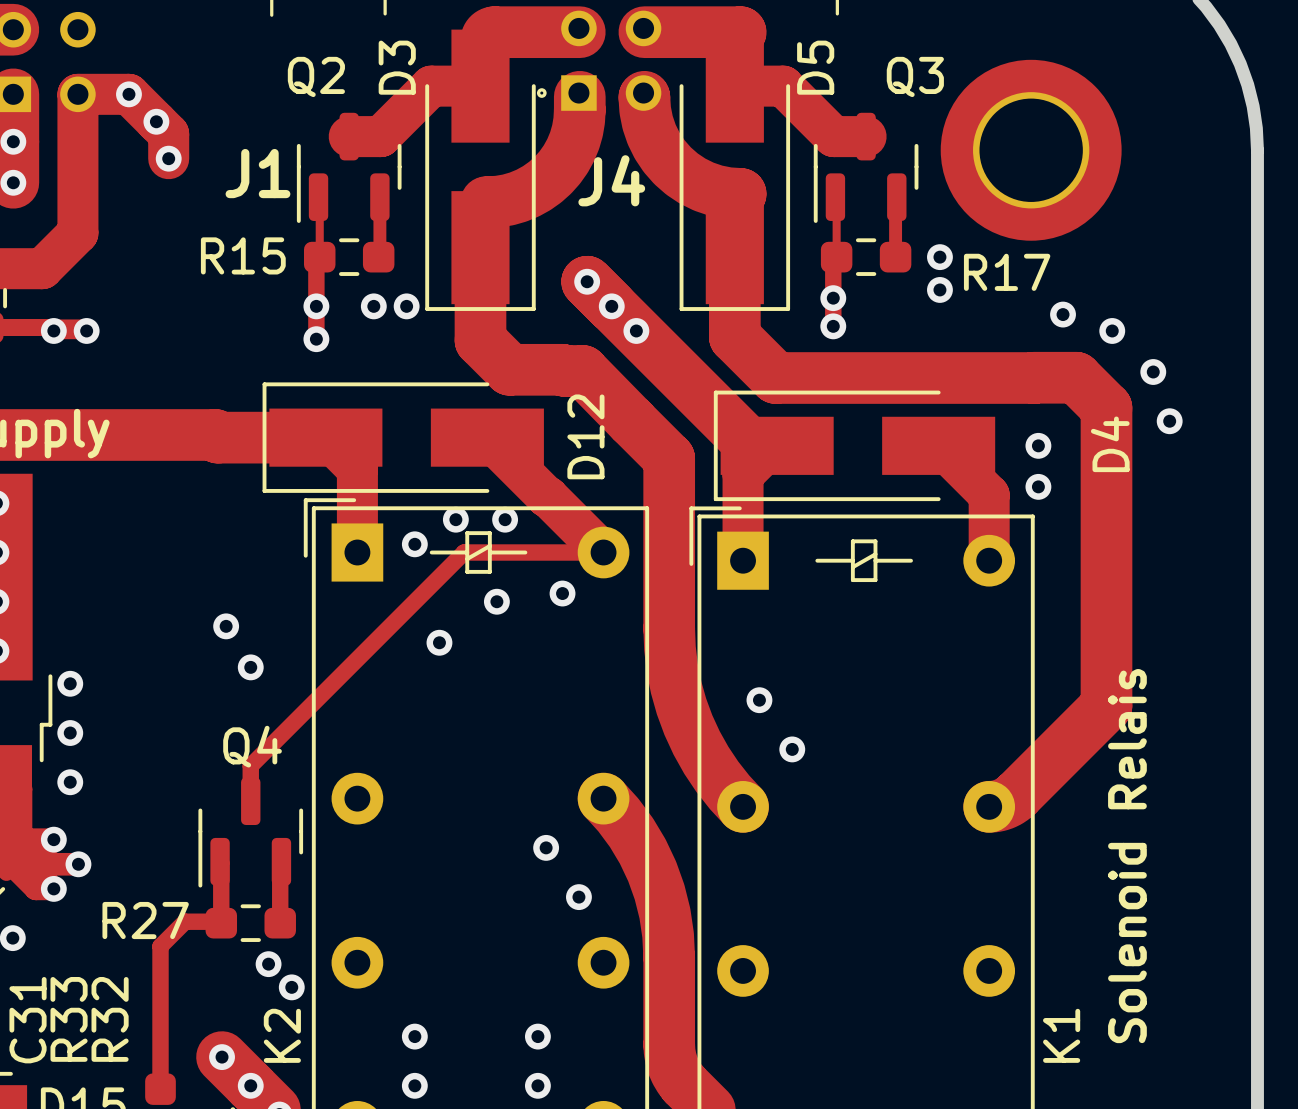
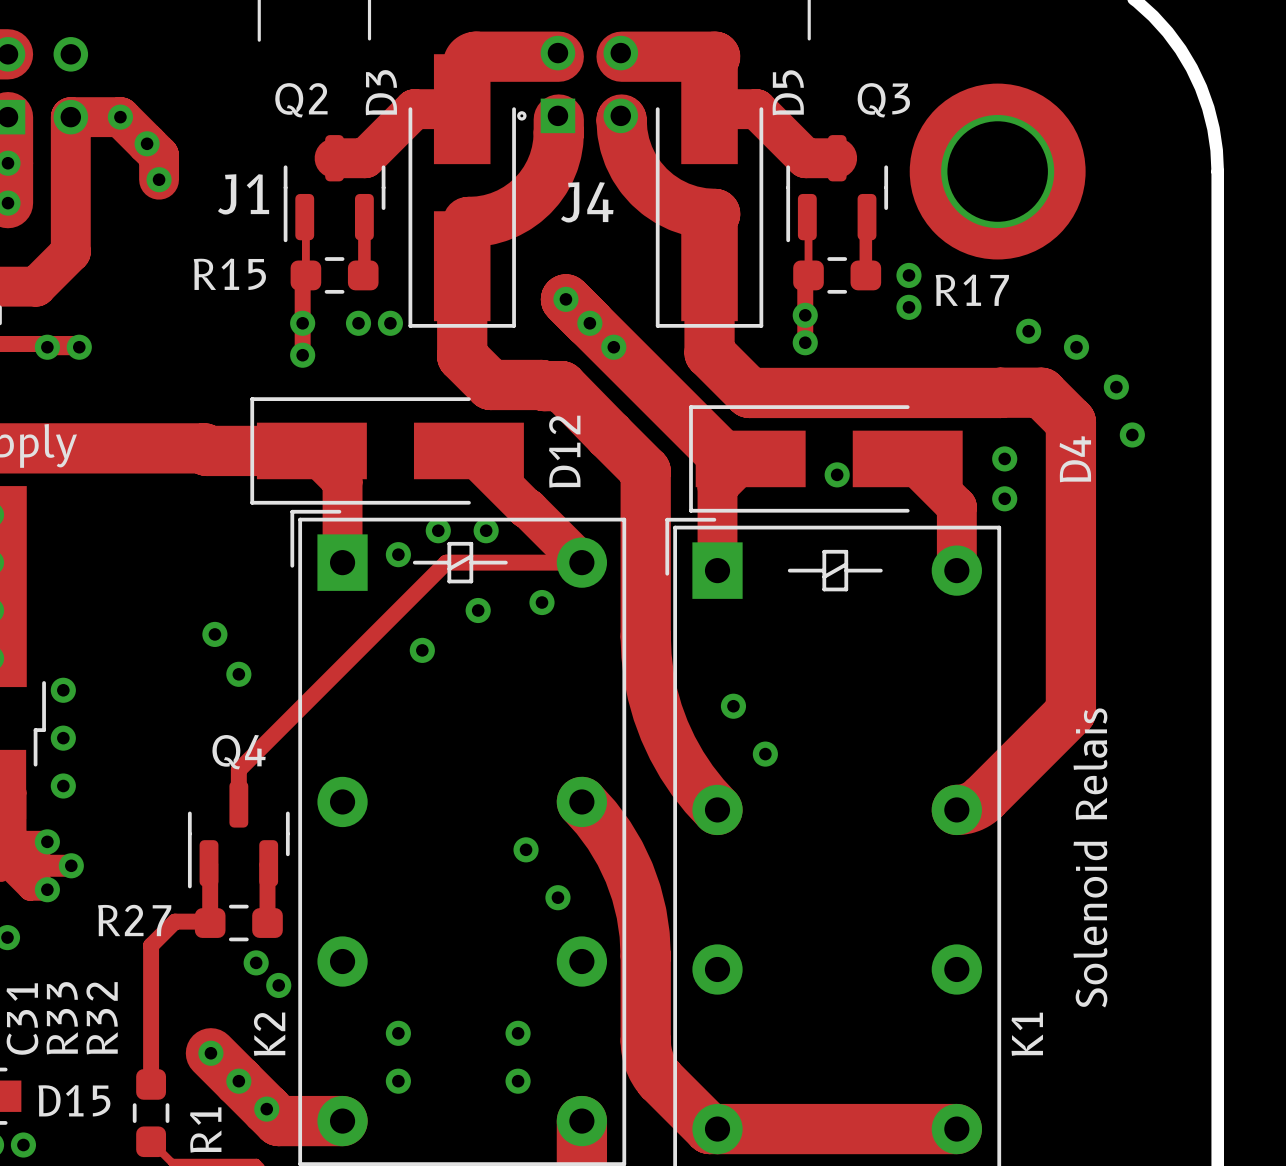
via: none -> (837, 474)

